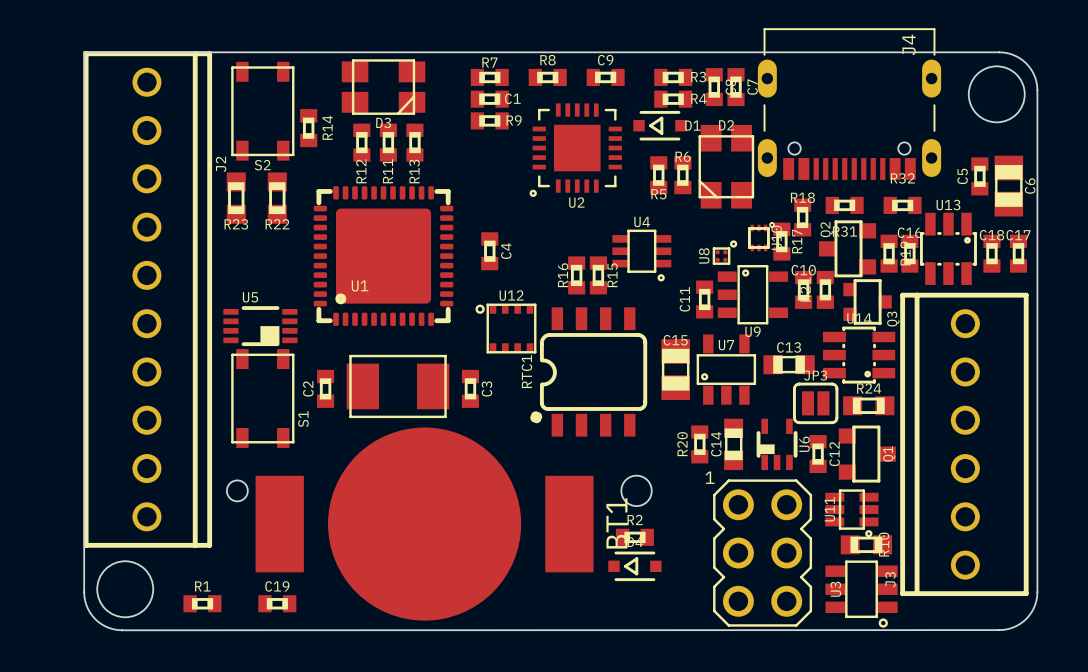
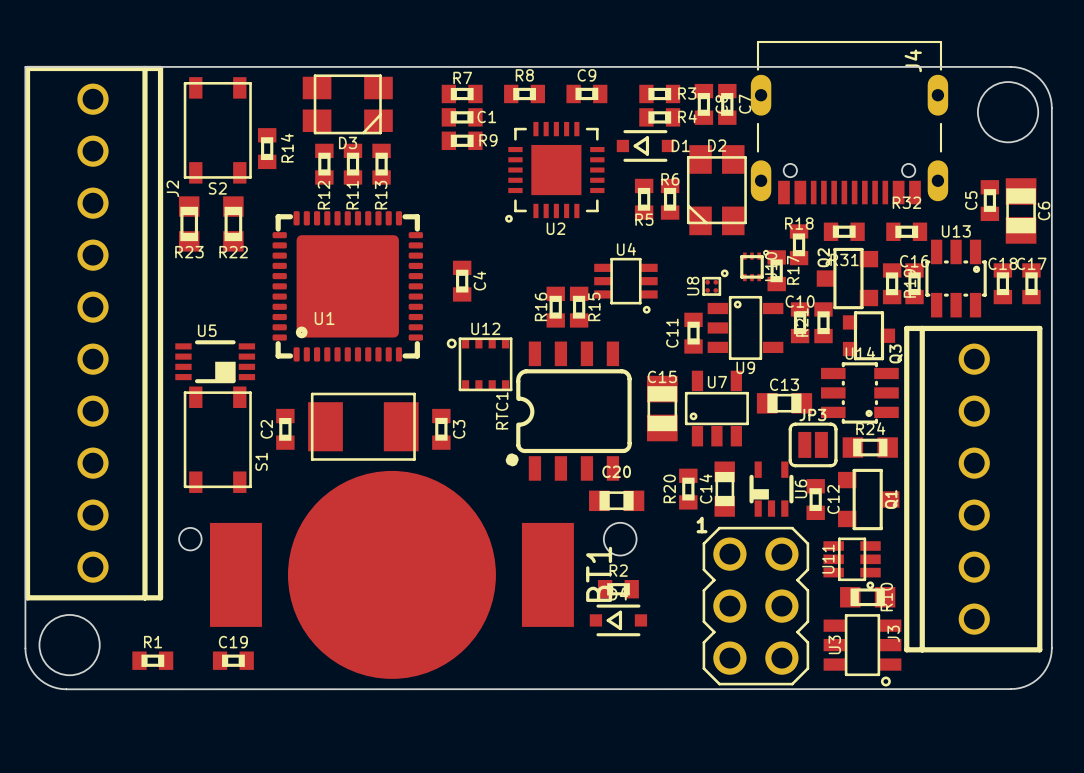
C20: none -> (616, 500)

